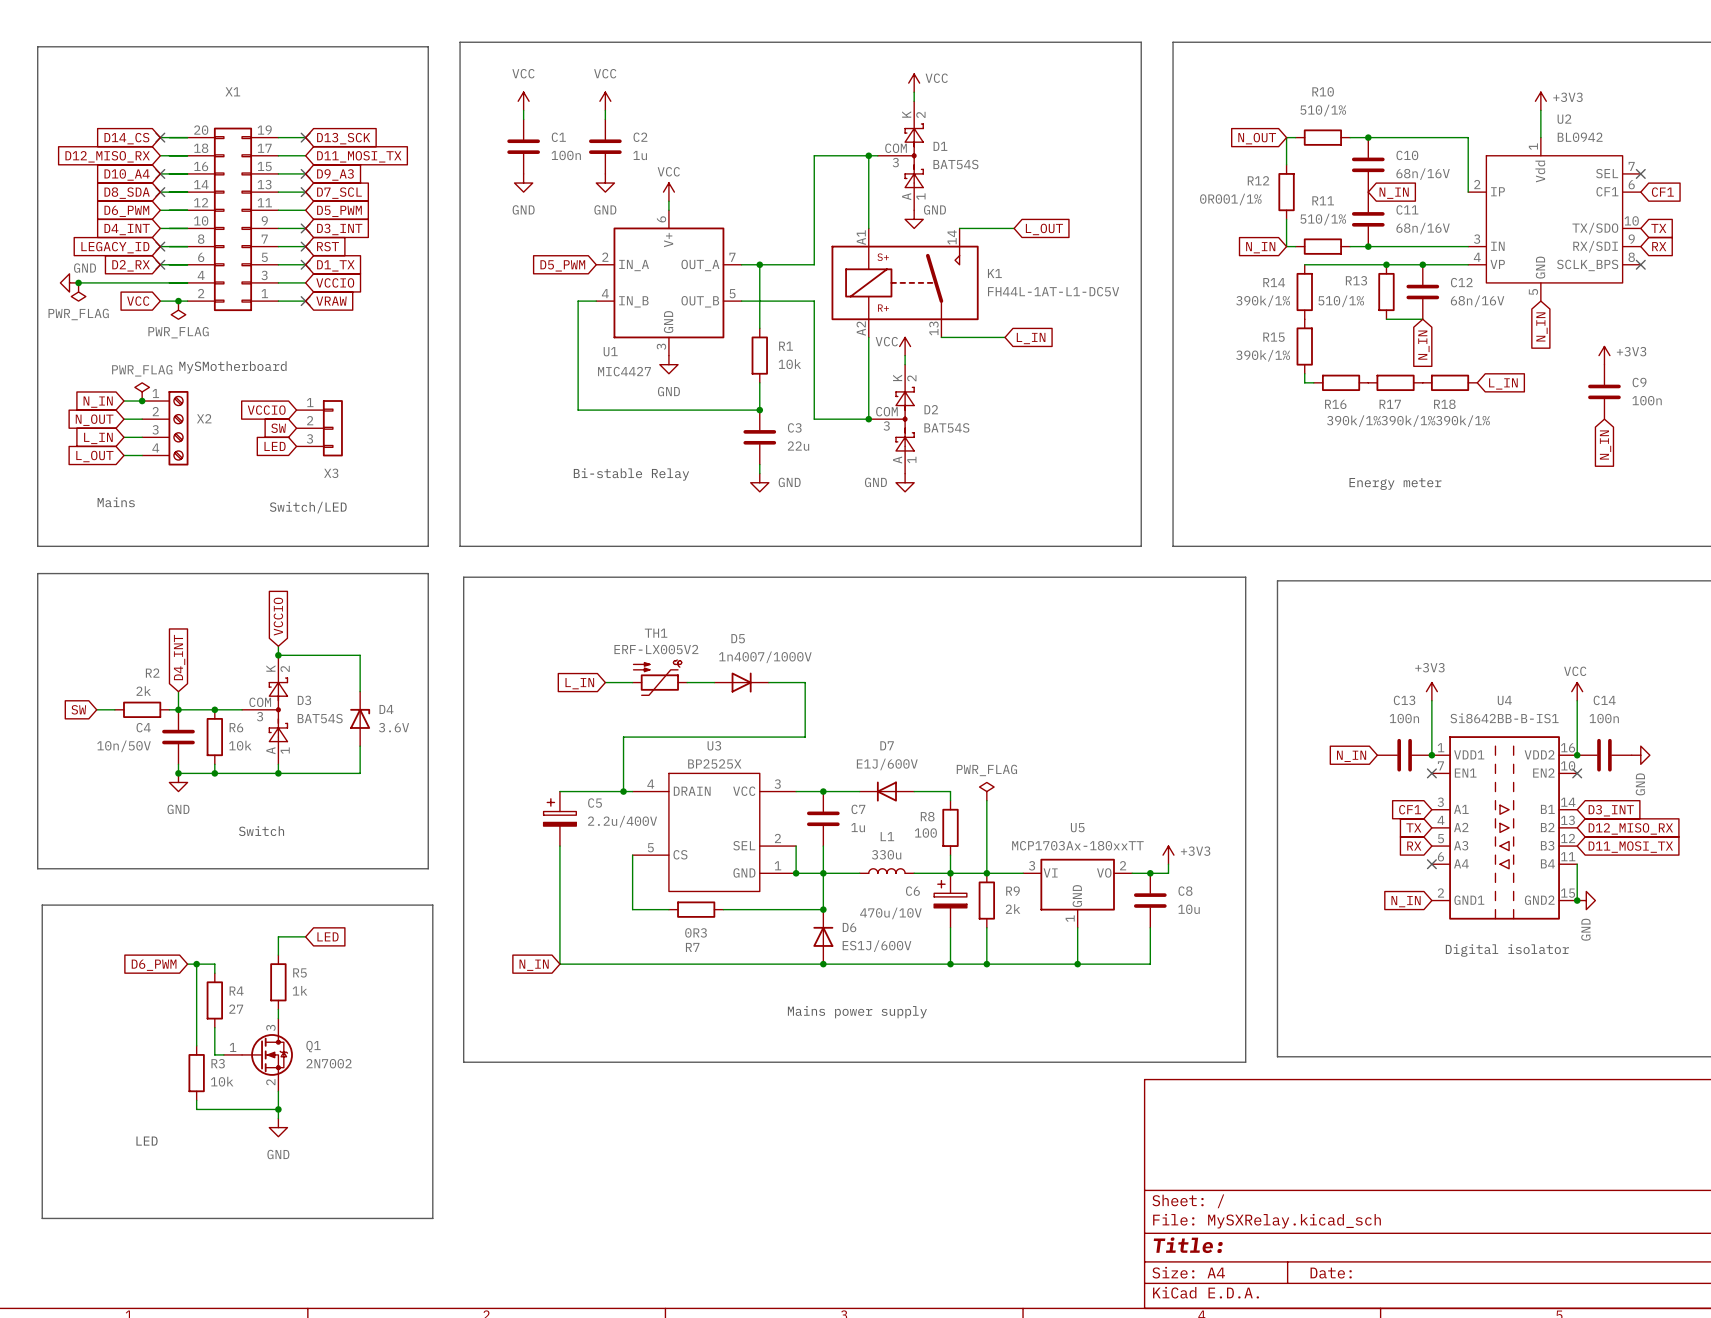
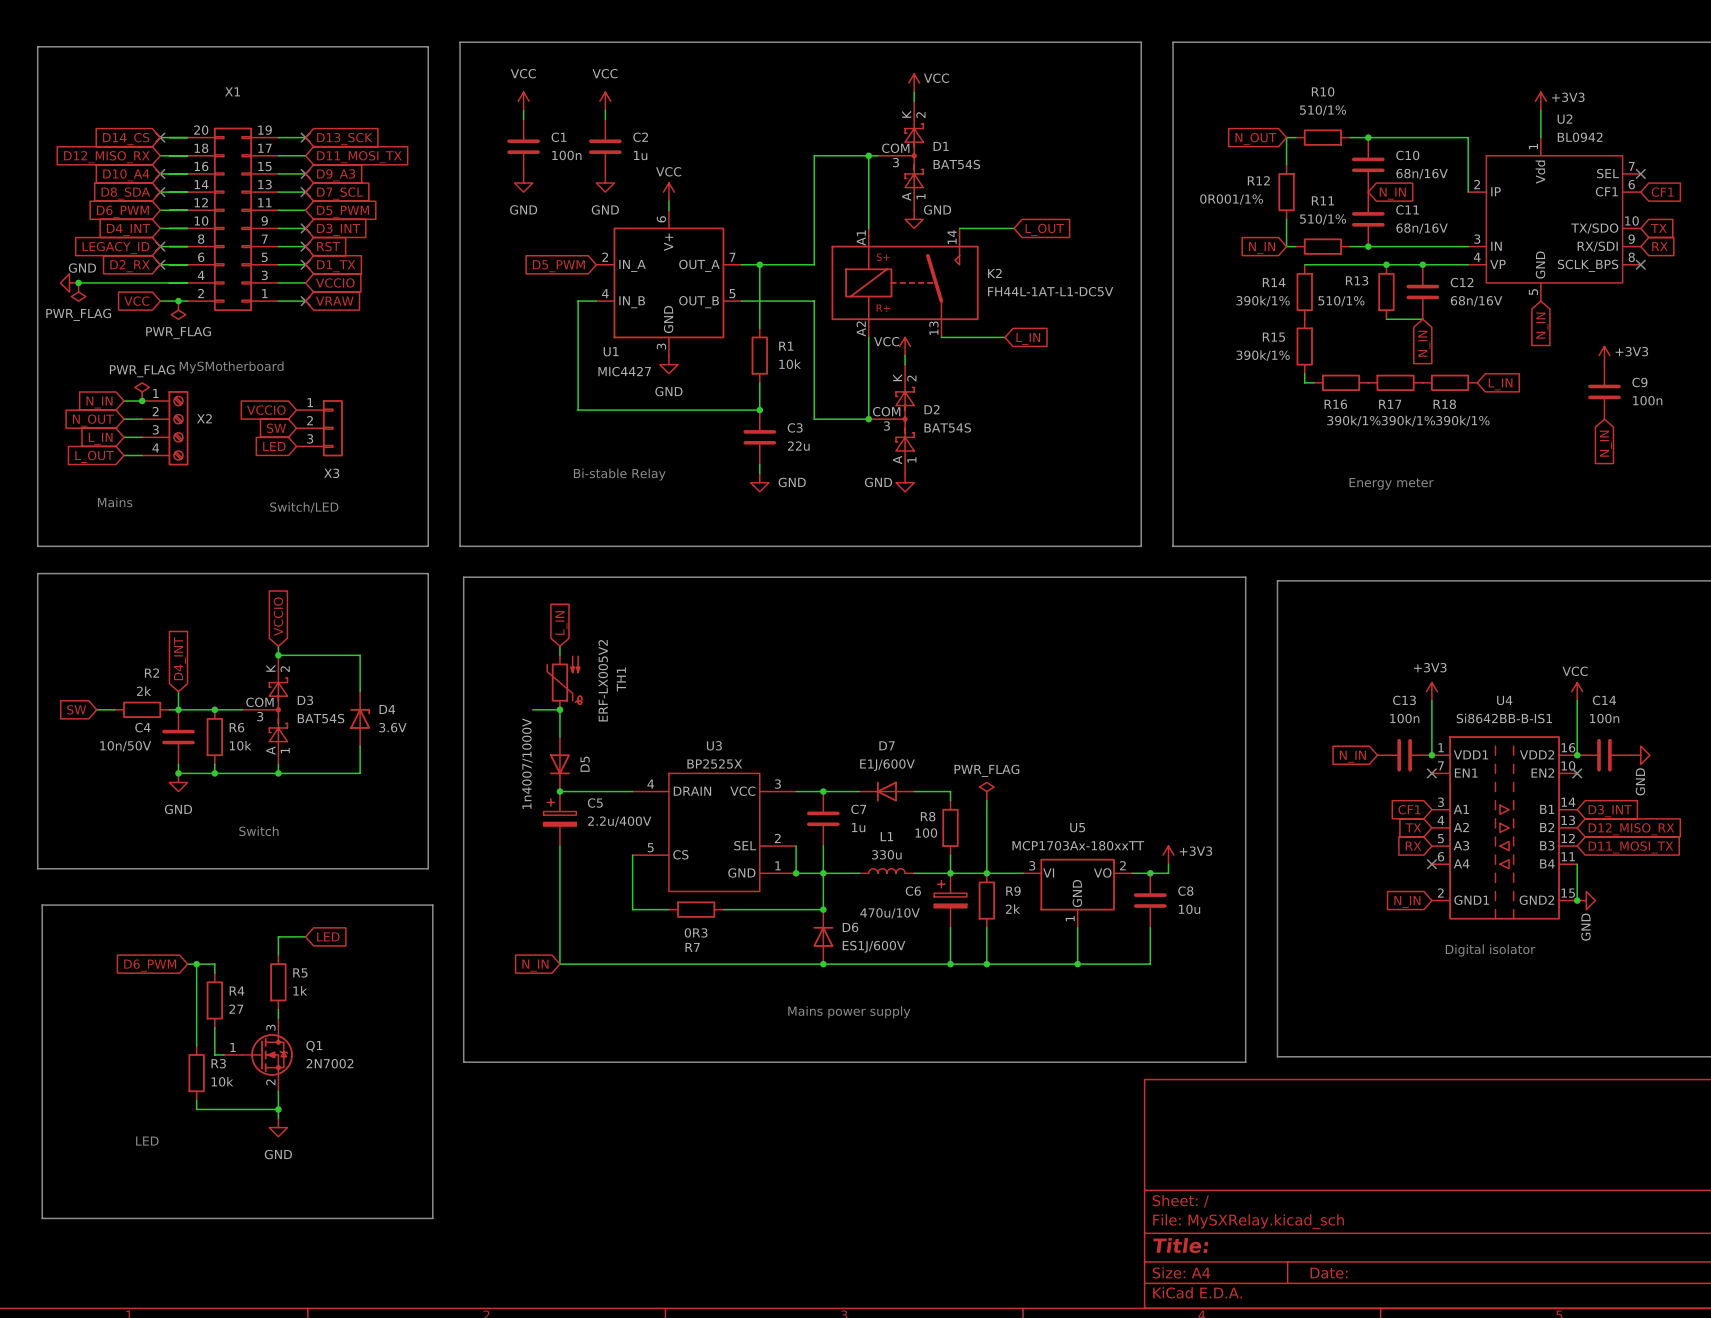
K1 name: K1 (994, 273) -> K2 (994, 273)
D5 name position: D5 (738, 638) -> D5 (585, 764)
wire: none -> (559, 646) (559, 655)
D5 value position: 1n4007/1000V (765, 657) -> 1n4007/1000V (527, 763)
TH1 rotation: 0° (657, 677) -> 90° clockwise (564, 680)
TH1 position: (659, 677) -> (564, 682)
wire: (605, 682) (632, 682) -> none
wire: (687, 682) (714, 682) -> none
D5 rotation: 0° (741, 682) -> 90° clockwise (559, 764)
D5 position: (741, 682) -> (559, 764)
wire: (768, 682) (805, 682) (805, 737) (623, 737) (623, 791) -> none
global label rotation: 0° (579, 683) -> 90° clockwise (561, 622)
global label position: L_IN (579, 683) -> L_IN (561, 622)
wire: none -> (532, 709) (559, 709) (559, 737)
junction: none -> (559, 709)
junction: none -> (559, 791)
junction: (623, 791) -> none

